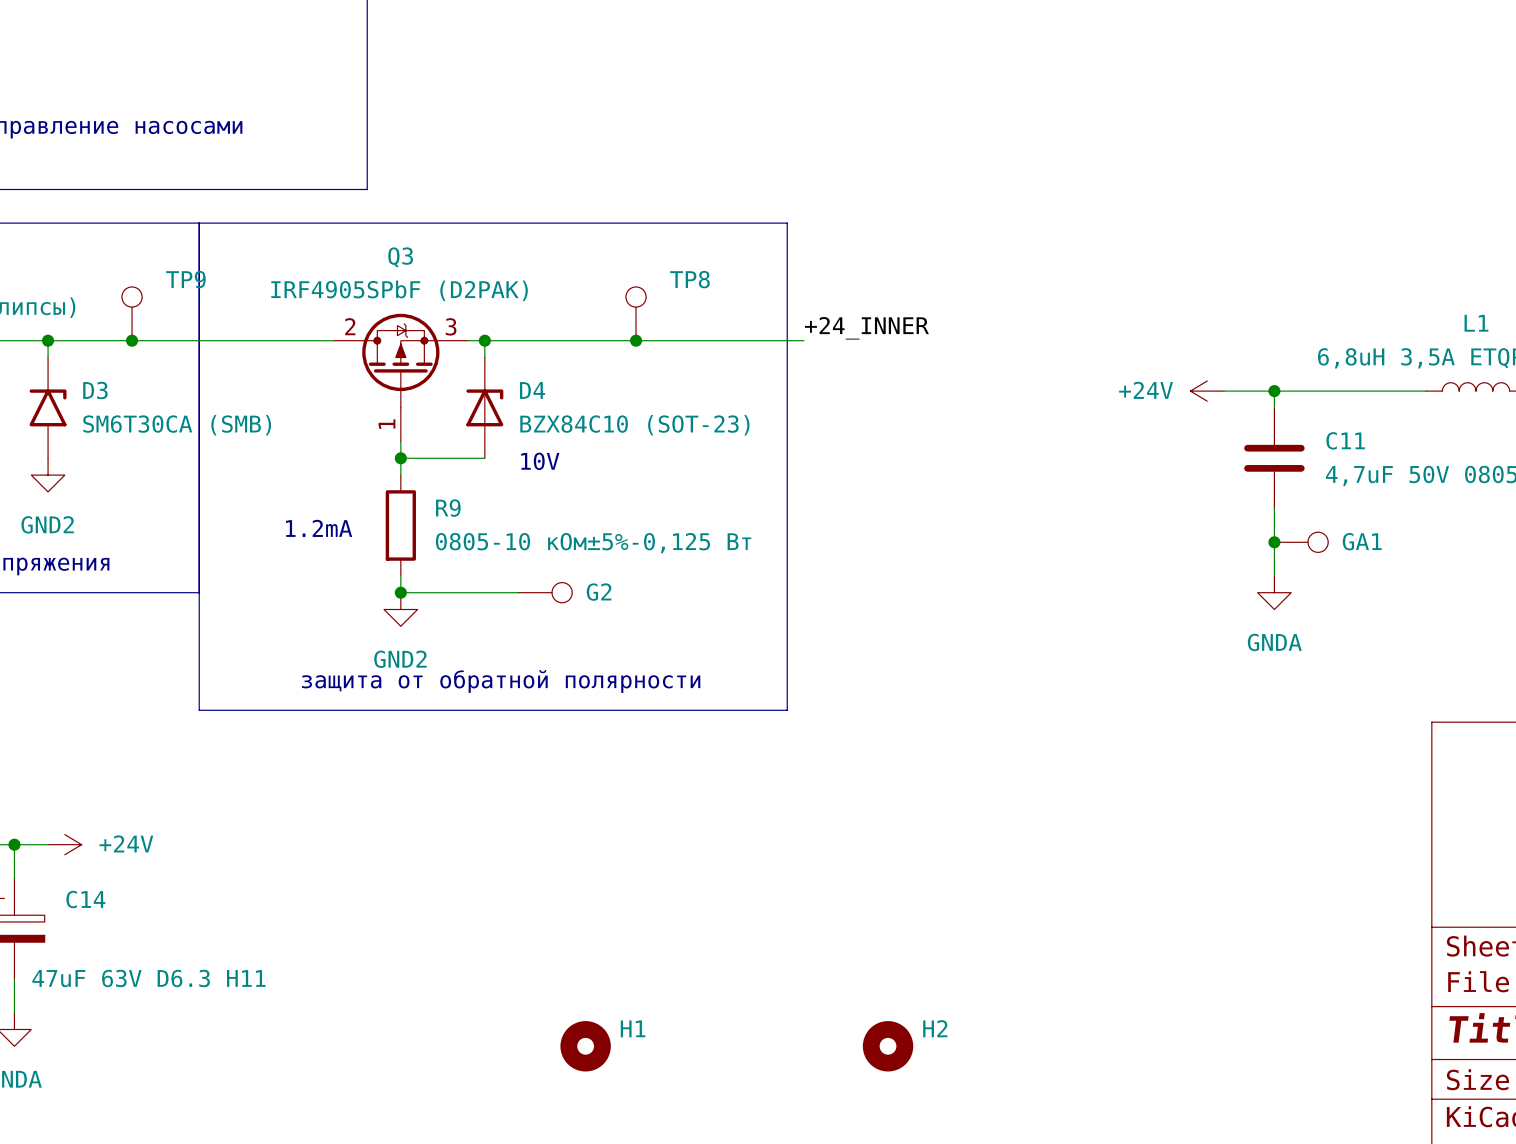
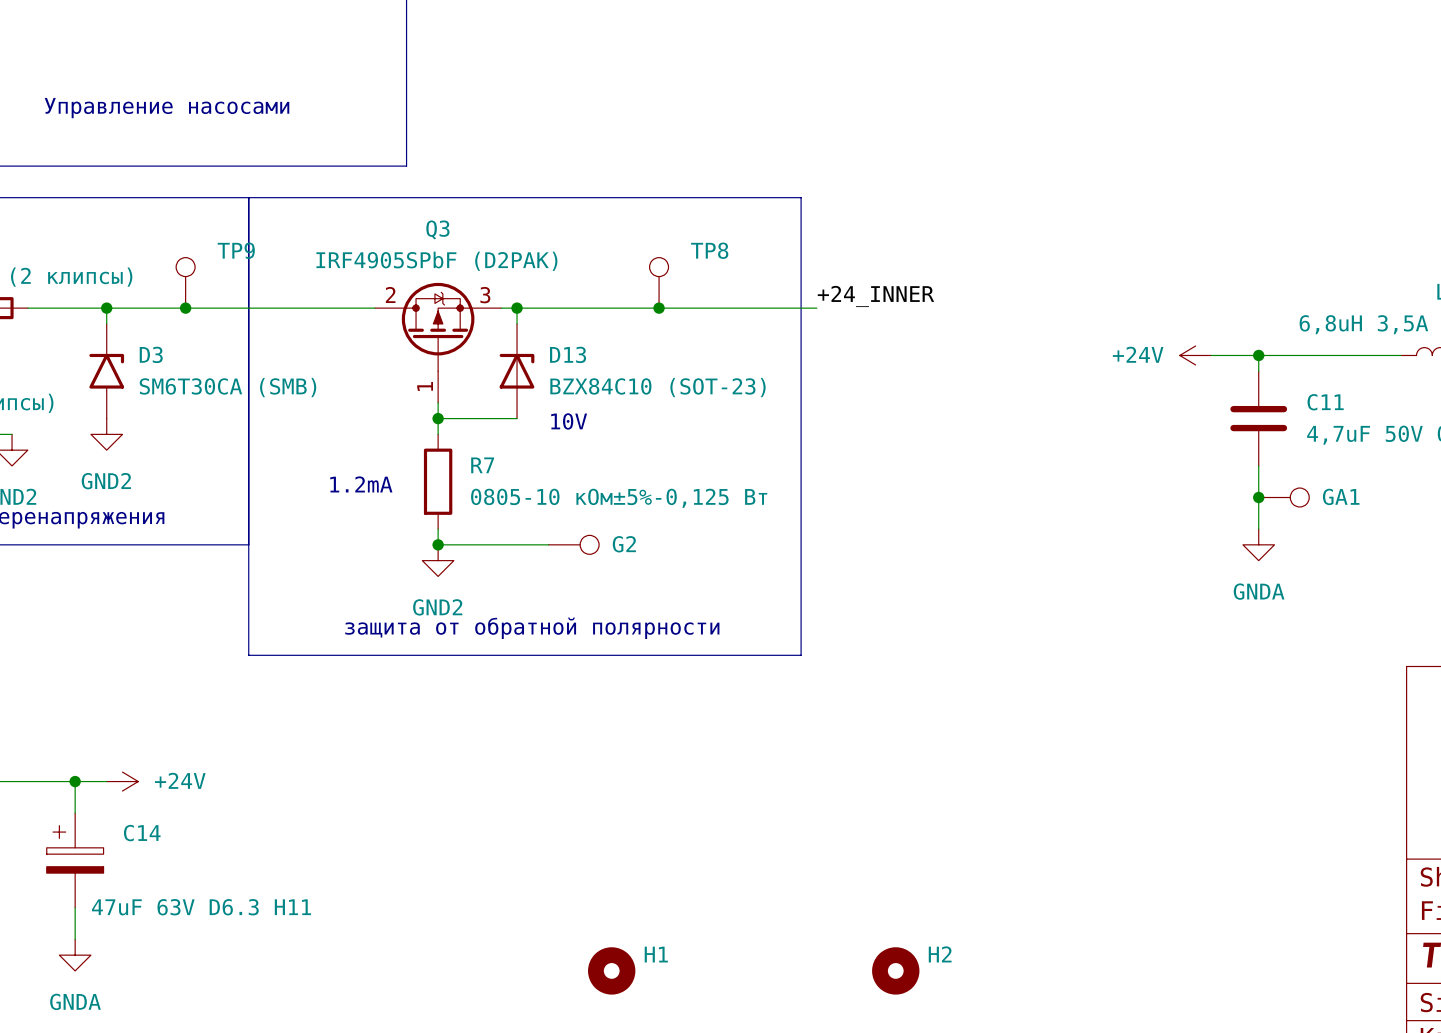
D4 name: D4 (532, 390) -> D13 (568, 354)
R9 name: R9 (448, 508) -> R7 (482, 465)

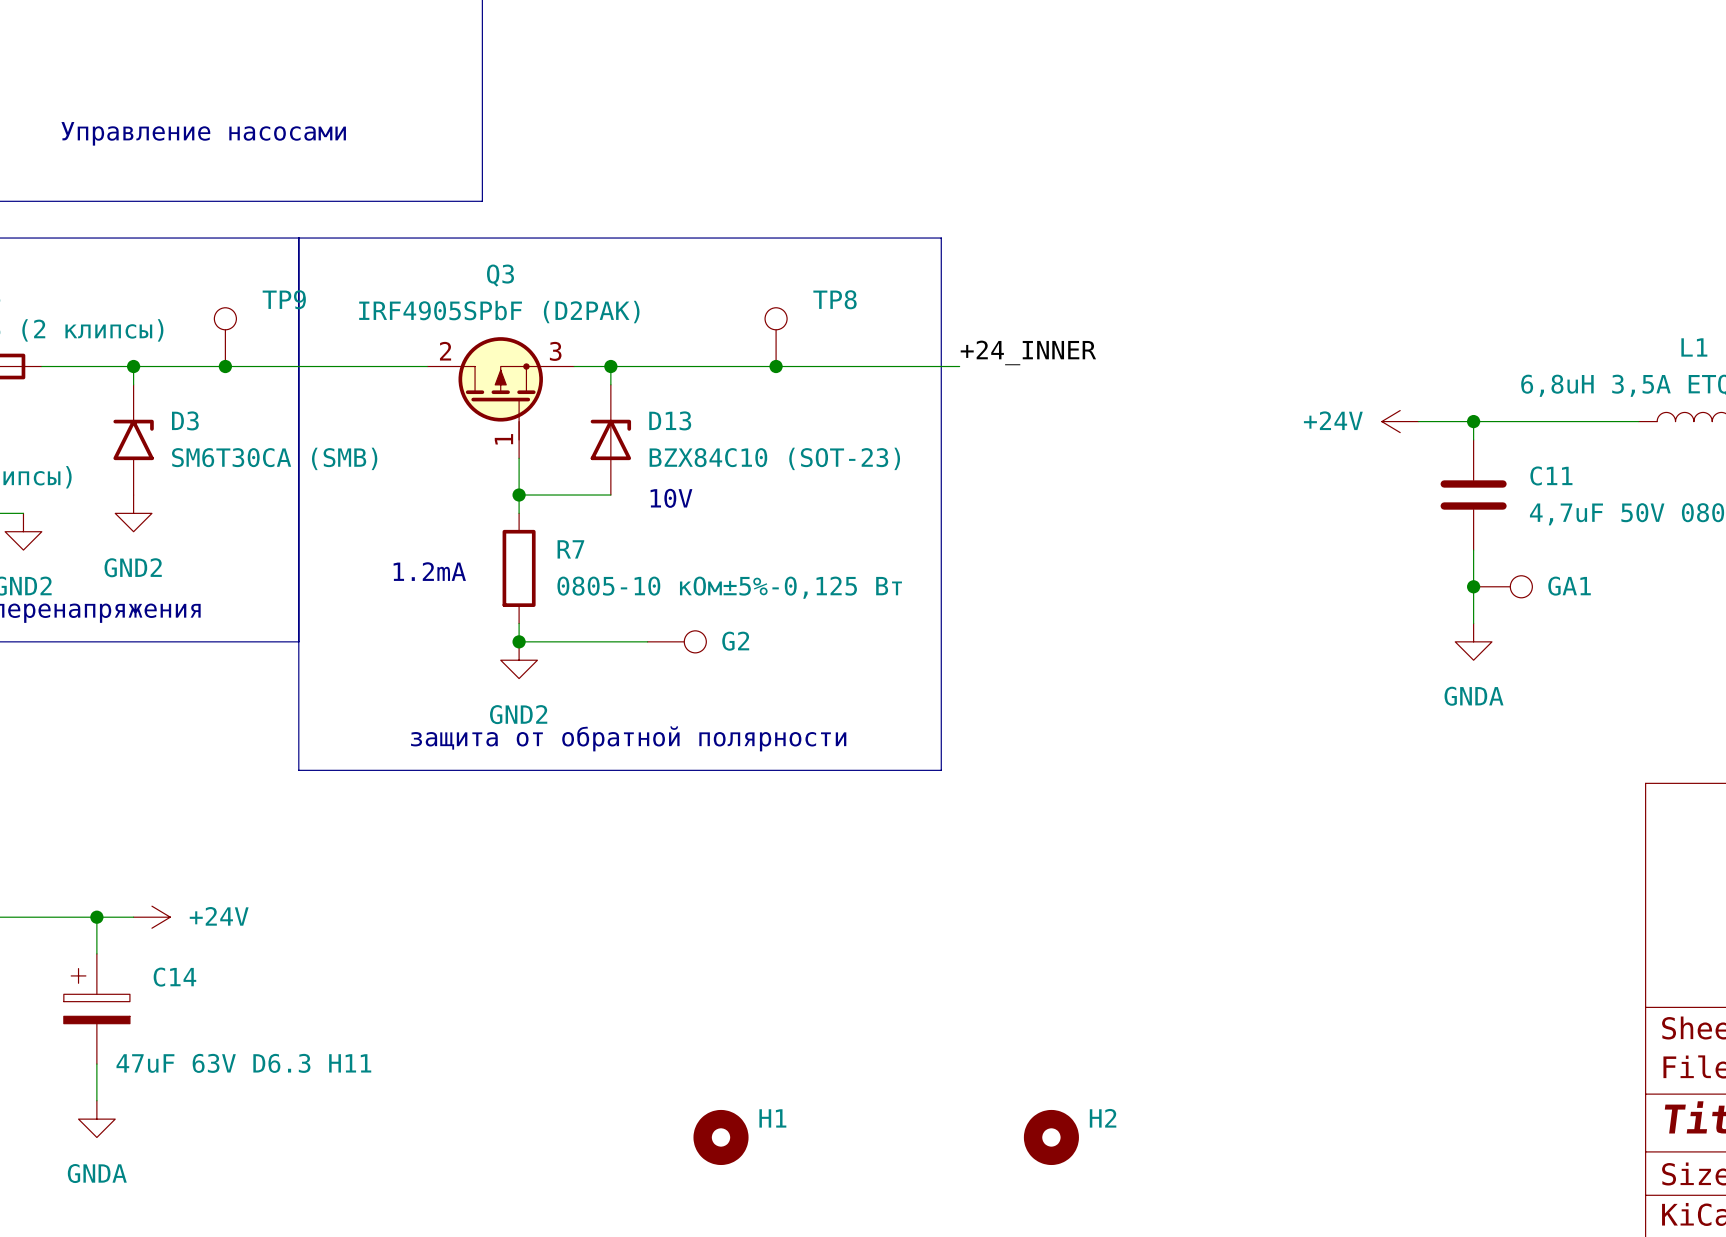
Q3 symbol: [374, 282, 502, 403] -> [427, 337, 575, 459]

